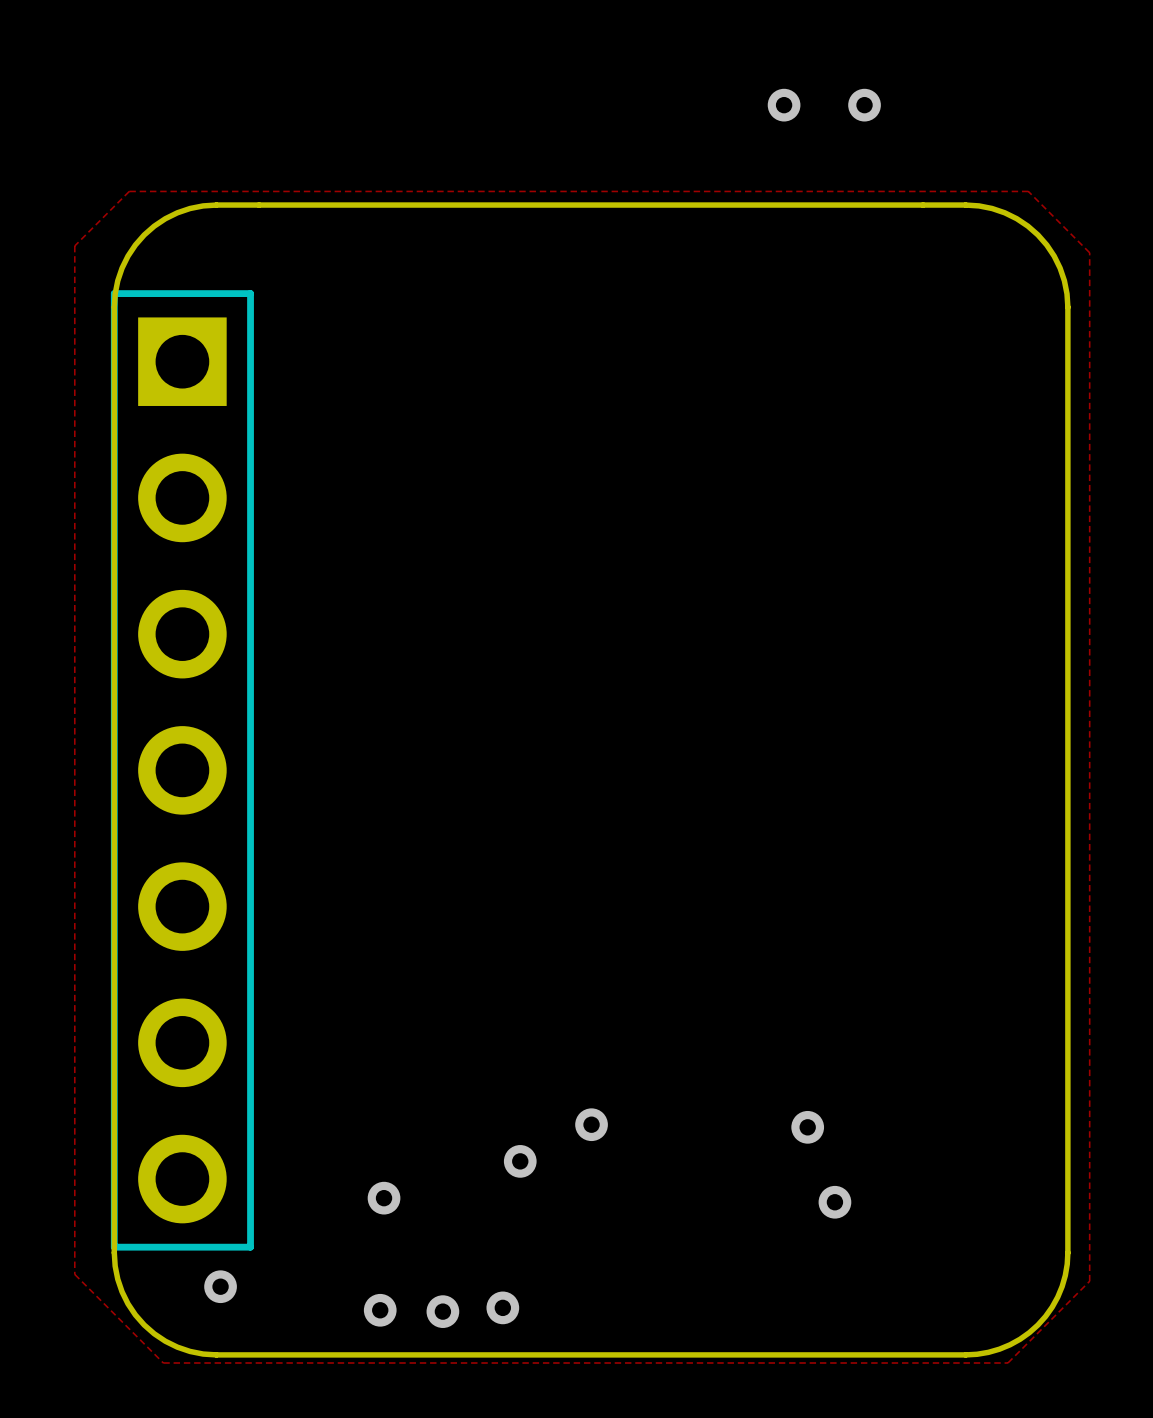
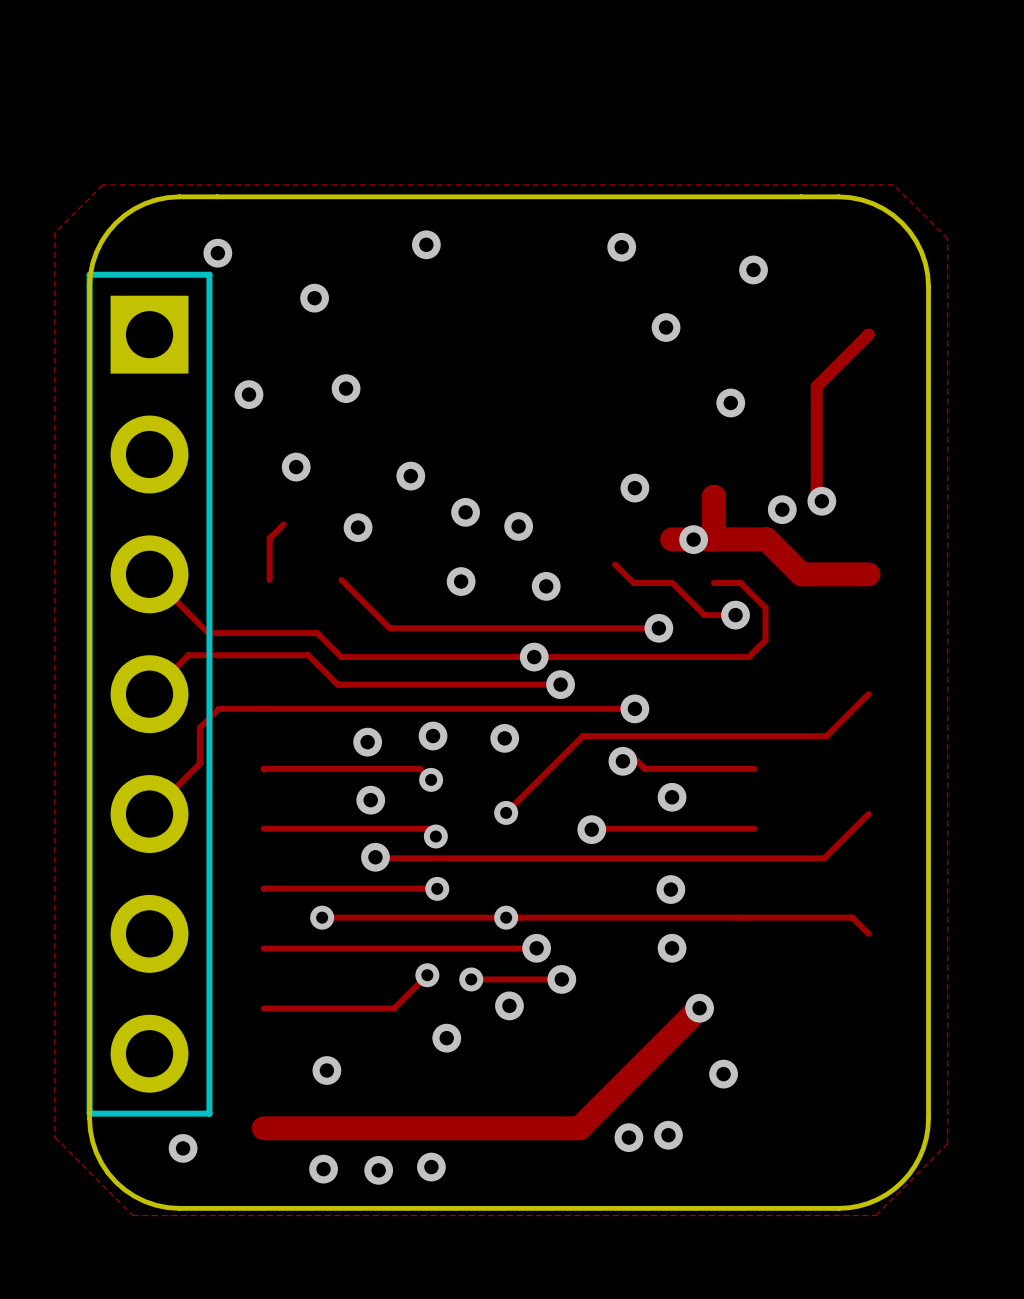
via: (784, 105) -> none
via: (864, 105) -> none
via: none -> (426, 244)
via: none -> (621, 247)
via: none -> (217, 253)
via: none -> (753, 269)
via: none -> (314, 298)
via: none -> (666, 327)
track: none -> (868, 334) (816, 386) (816, 496) (821, 501)
via: none -> (346, 388)
via: none -> (249, 394)
via: none -> (730, 402)
via: none -> (296, 467)
via: none -> (410, 476)
via: none -> (634, 488)
track: none -> (713, 496) (713, 539)
via: none -> (821, 501)
via: none -> (782, 509)
via: none -> (465, 512)
track: none -> (283, 524) (269, 538) (269, 579)
via: none -> (518, 526)
via: none -> (358, 527)
track: none -> (672, 539) (693, 539)
via: none -> (693, 539)
track: none -> (693, 539) (766, 539) (801, 574) (868, 574)
track: none -> (615, 564) (633, 583) (672, 583) (704, 615) (735, 615)
track: none -> (149, 574) (208, 633) (317, 633) (341, 657) (748, 657) (765, 640) (765, 607) (740, 583) (713, 583)
track: none -> (341, 579) (389, 628) (658, 628)
via: none -> (461, 581)
via: none -> (546, 586)
via: none -> (735, 615)
via: none -> (658, 628)
via: none -> (534, 657)
track: none -> (560, 684) (337, 684) (308, 655) (188, 655) (149, 694)
via: none -> (560, 684)
track: none -> (868, 694) (826, 736) (582, 736) (506, 812)
track: none -> (634, 708) (218, 708) (199, 727) (199, 763) (149, 814)
via: none -> (634, 708)
via: none -> (433, 736)
via: none -> (504, 738)
via: none -> (367, 742)
track: none -> (622, 761) (637, 761) (644, 768) (754, 768)
via: none -> (622, 761)
track: none -> (264, 769) (420, 768) (431, 779)
via: none -> (431, 779)
via: none -> (672, 797)
via: none -> (370, 800)
via: none -> (506, 812)
track: none -> (868, 814) (824, 858) (375, 857)
track: none -> (263, 828) (428, 828) (435, 836)
track: none -> (754, 828) (591, 829)
via: none -> (591, 829)
via: none -> (435, 836)
via: none -> (375, 857)
track: none -> (263, 888) (437, 888)
via: none -> (437, 888)
via: none -> (670, 889)
track: none -> (322, 917) (852, 917) (868, 933)
via: none -> (322, 917)
via: none -> (506, 917)
track: none -> (263, 948) (536, 948)
via: none -> (536, 948)
via: none -> (672, 948)
track: none -> (427, 975) (394, 1008) (263, 1008)
via: none -> (427, 975)
track: none -> (471, 979) (561, 979)
via: none -> (471, 979)
via: none -> (561, 979)
track: none -> (699, 1008) (579, 1128) (263, 1128)
via: none -> (668, 1135)
via: none -> (628, 1137)

